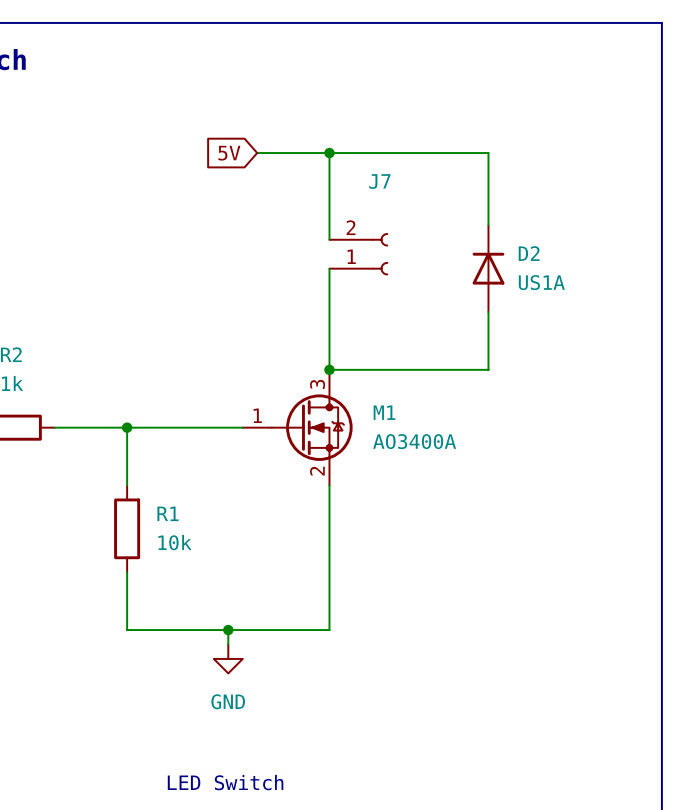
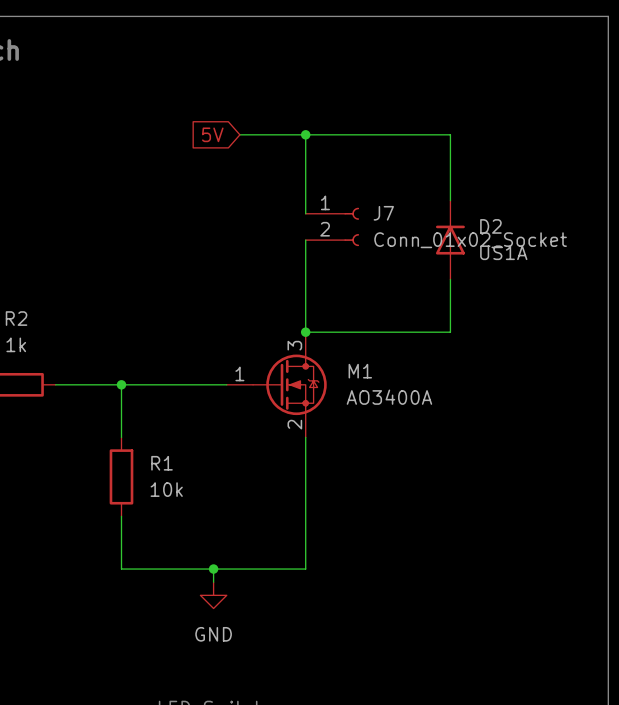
J7 name position: J7 (379, 181) -> J7 (383, 213)
J7 flip: as is (380, 254) -> up-down (351, 226)
J7 value: none -> Conn_01x02_Socket (470, 240)

